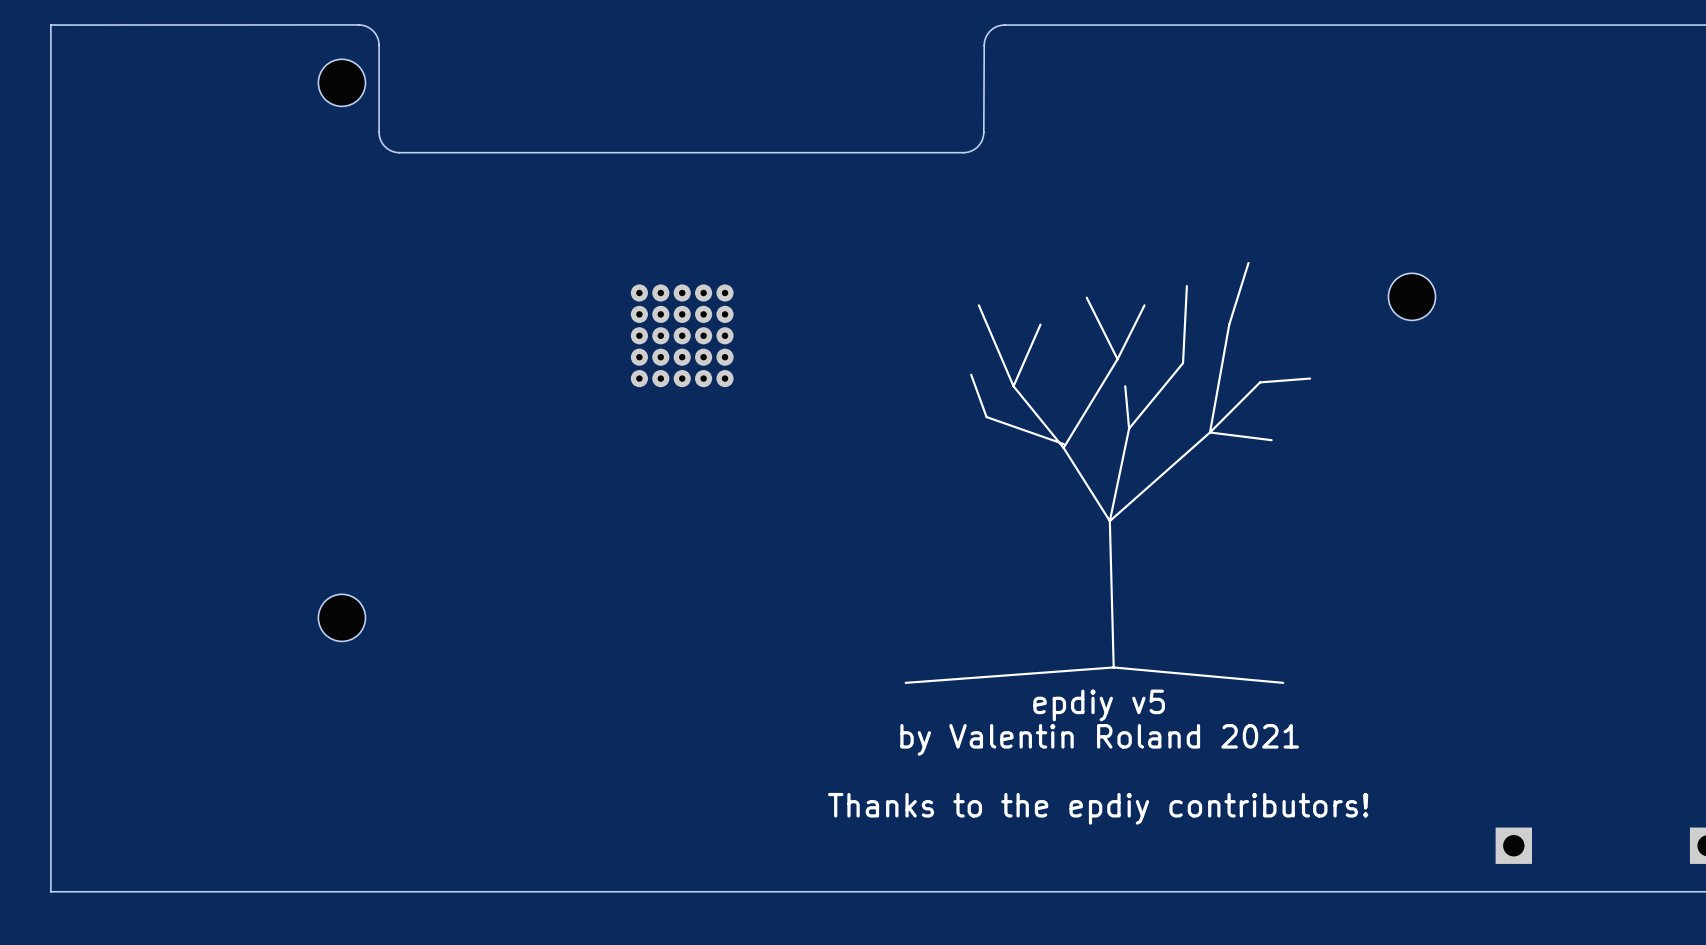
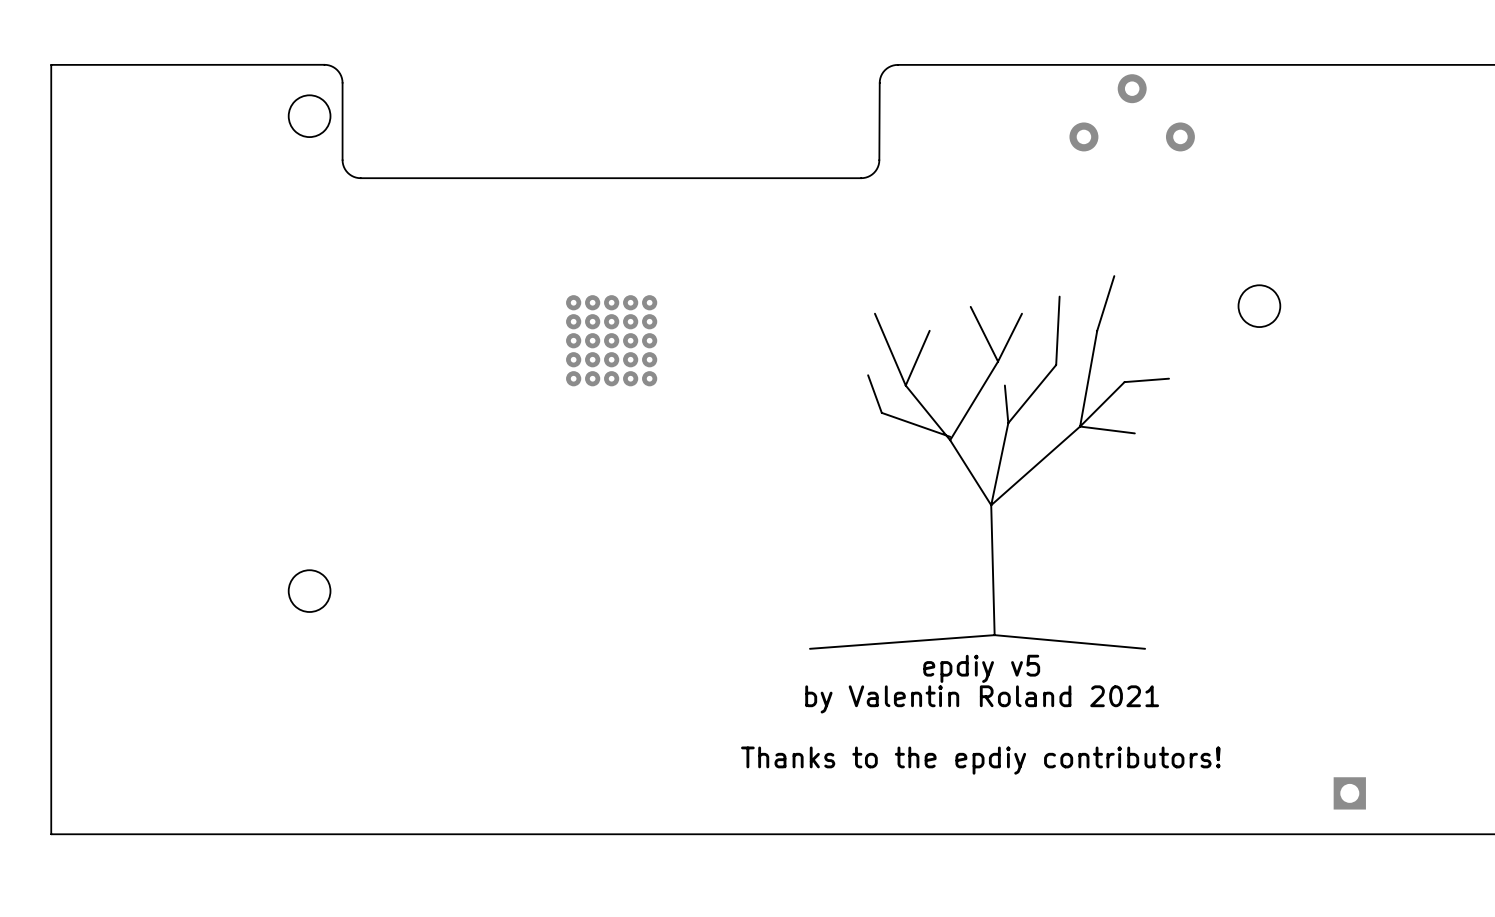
part: none -> (1132, 112)

